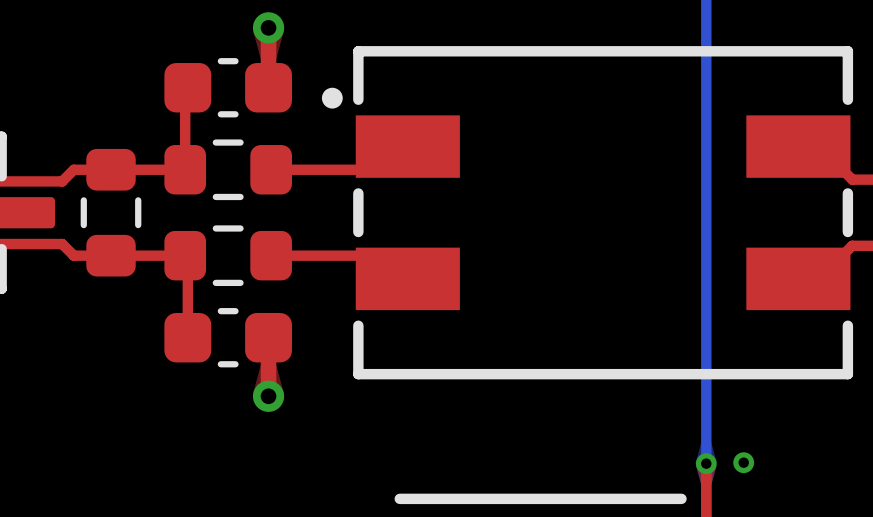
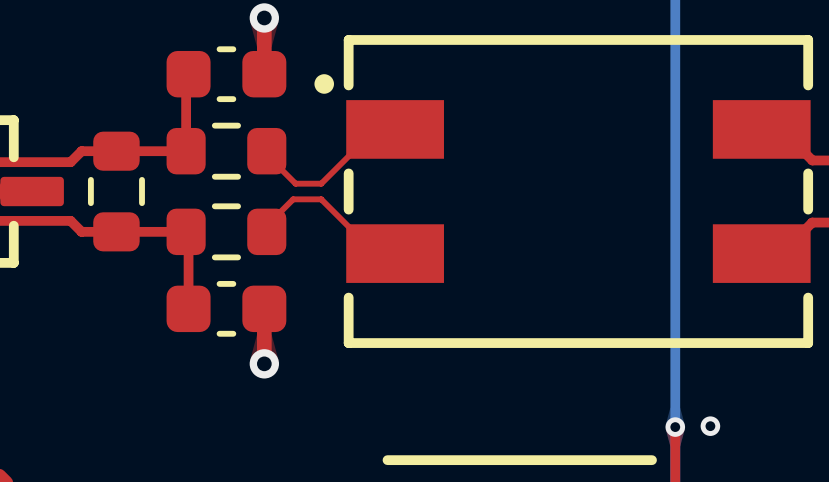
top track: (407, 146) (384, 169) (271, 169) -> (375, 129) (321, 183) (295, 183) (266, 154) (266, 151)
top track: (271, 255) (384, 255) (407, 278) -> (266, 231) (266, 225) (293, 199) (321, 199) (375, 253)

